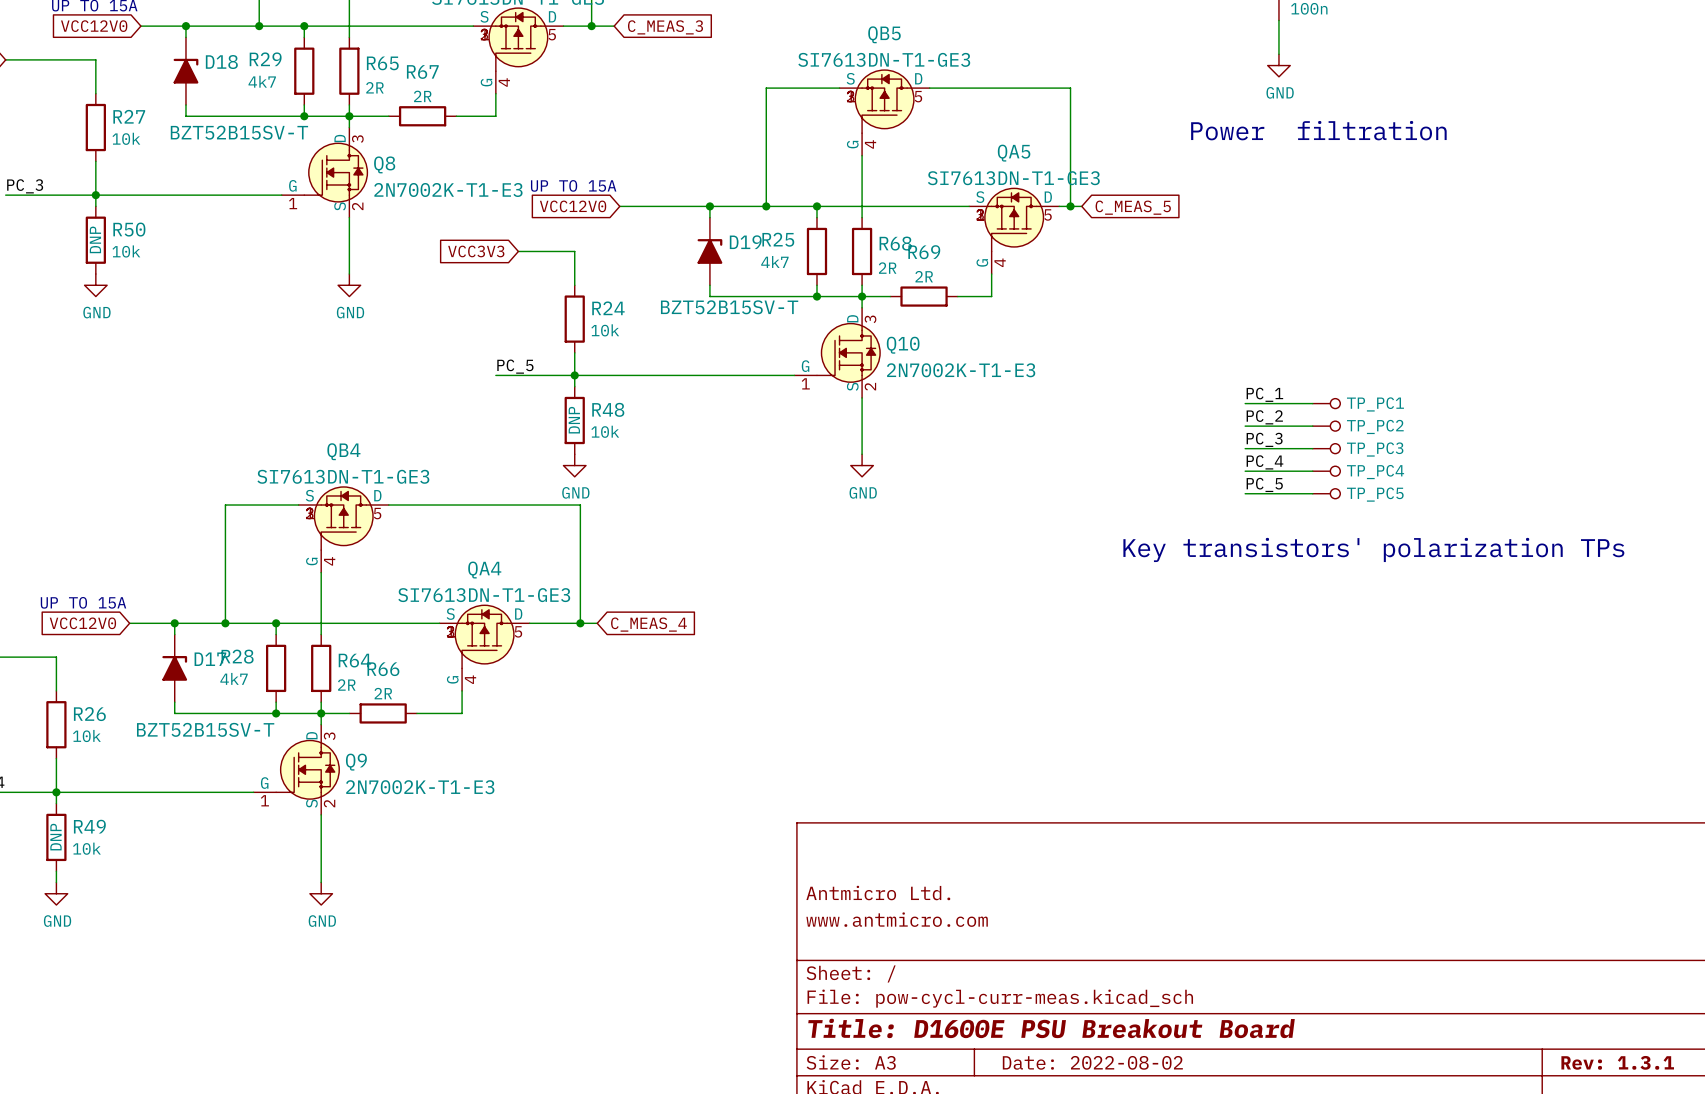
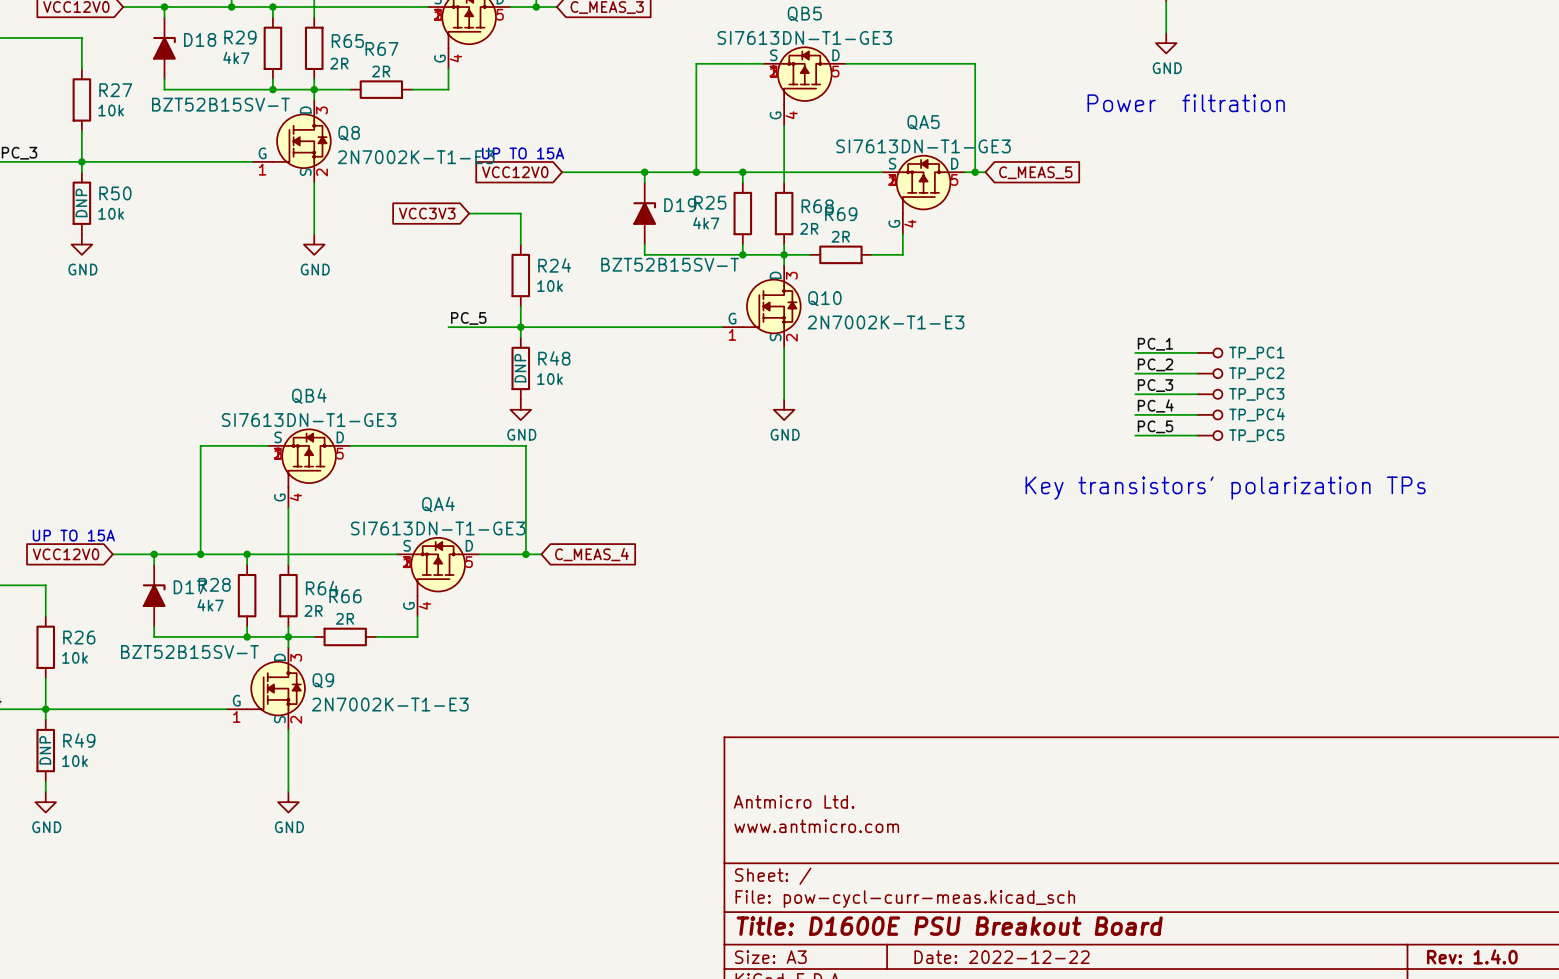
title block: Date: 2022-08-02 (1092, 1062) -> Date: 2022-12-22 (1002, 957)
title block: Rev: 1.3.1 (1617, 1062) -> Rev: 1.4.0 (1472, 956)

